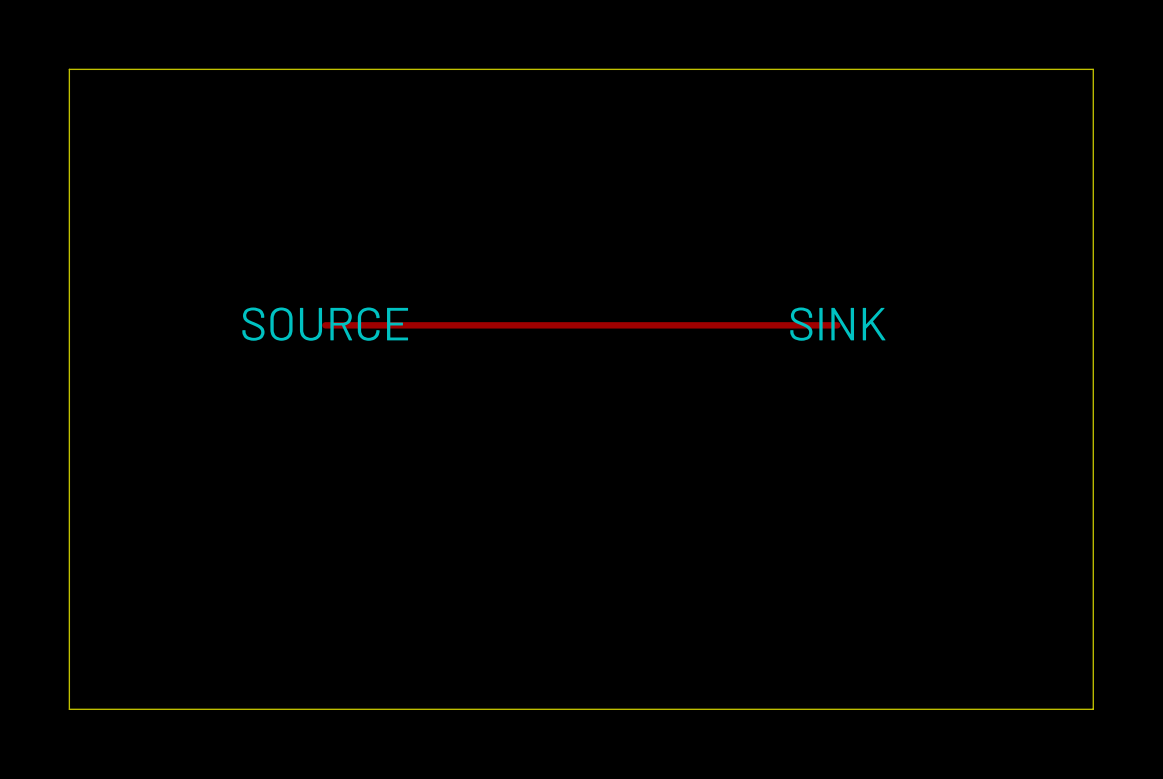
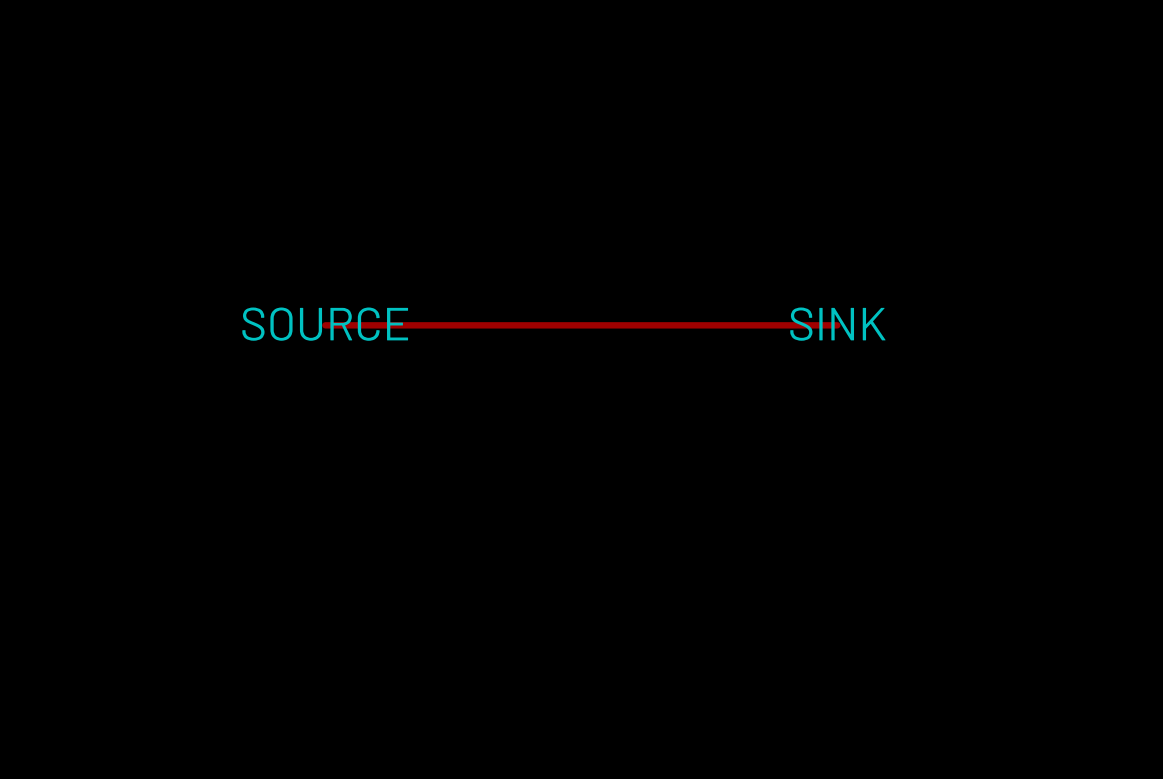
board edge: (69, 69) (1093, 69) (1093, 709) (69, 709) (69, 69) -> none

